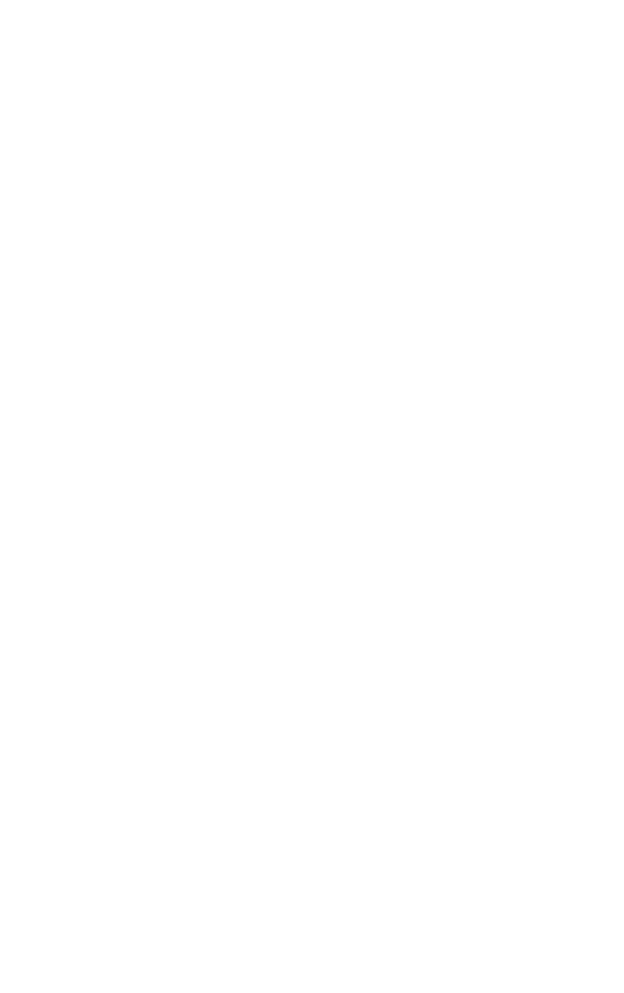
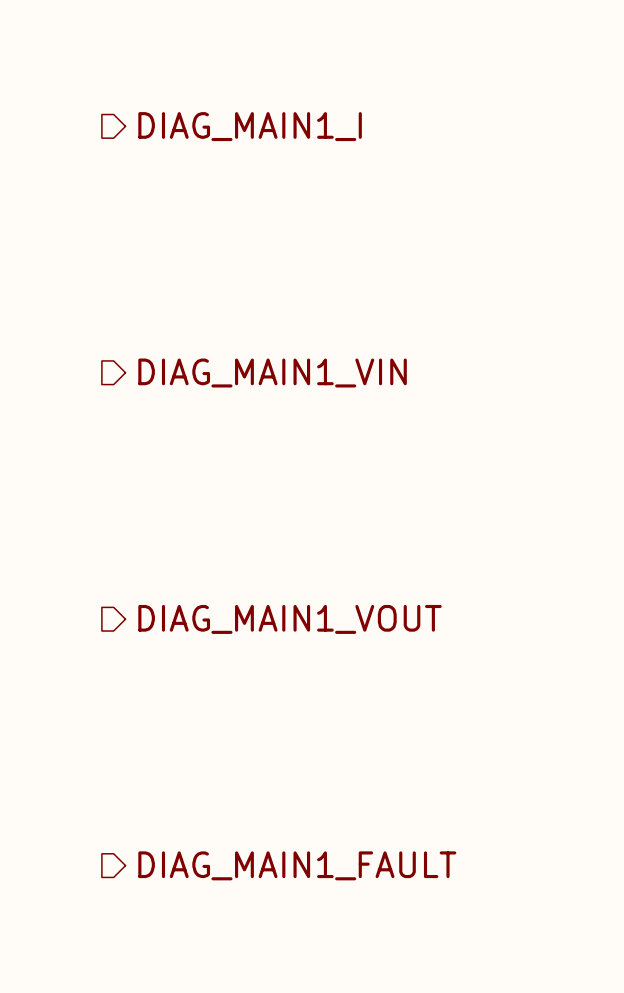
hierarchical label: none -> DIAG_MAIN1_I (250, 126)
hierarchical label: none -> DIAG_MAIN1_VIN (272, 373)
hierarchical label: none -> DIAG_MAIN1_VOUT (290, 619)
hierarchical label: none -> DIAG_MAIN1_FAULT (297, 865)

